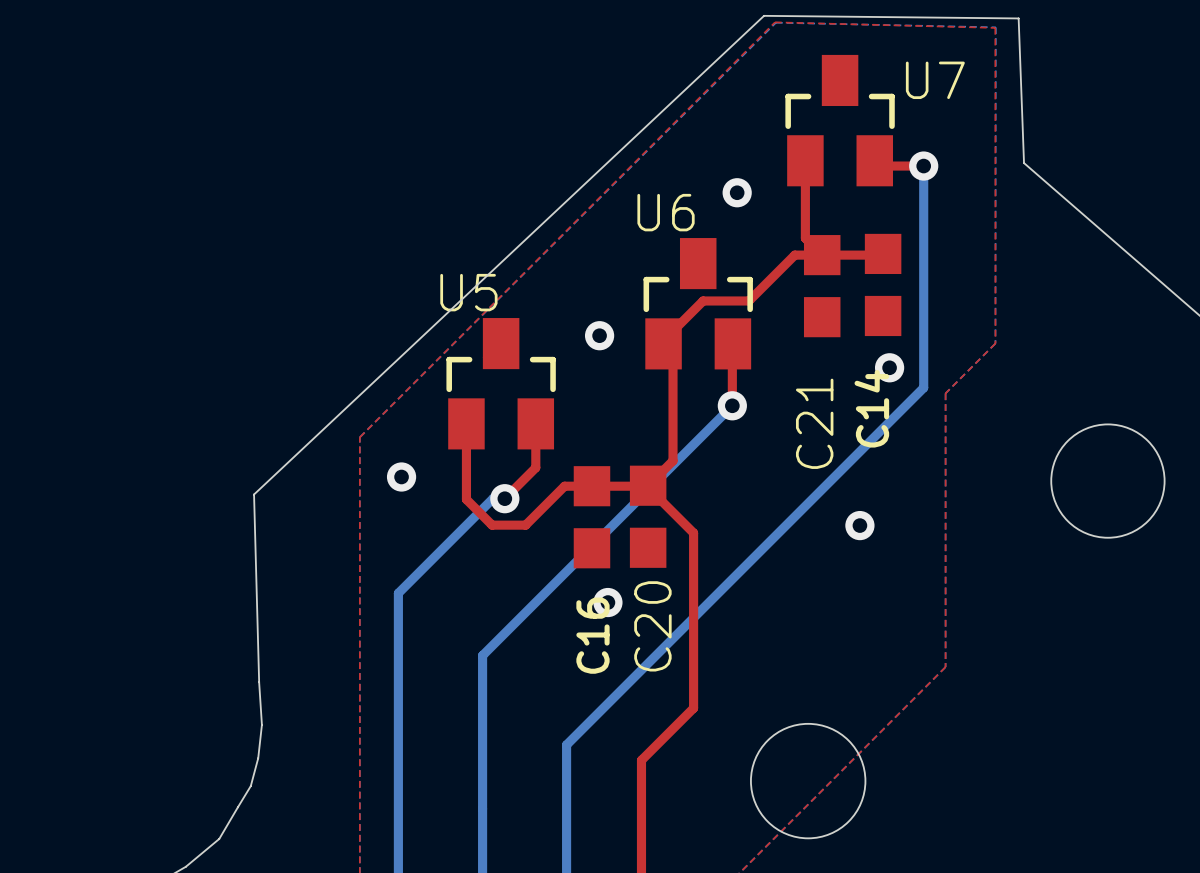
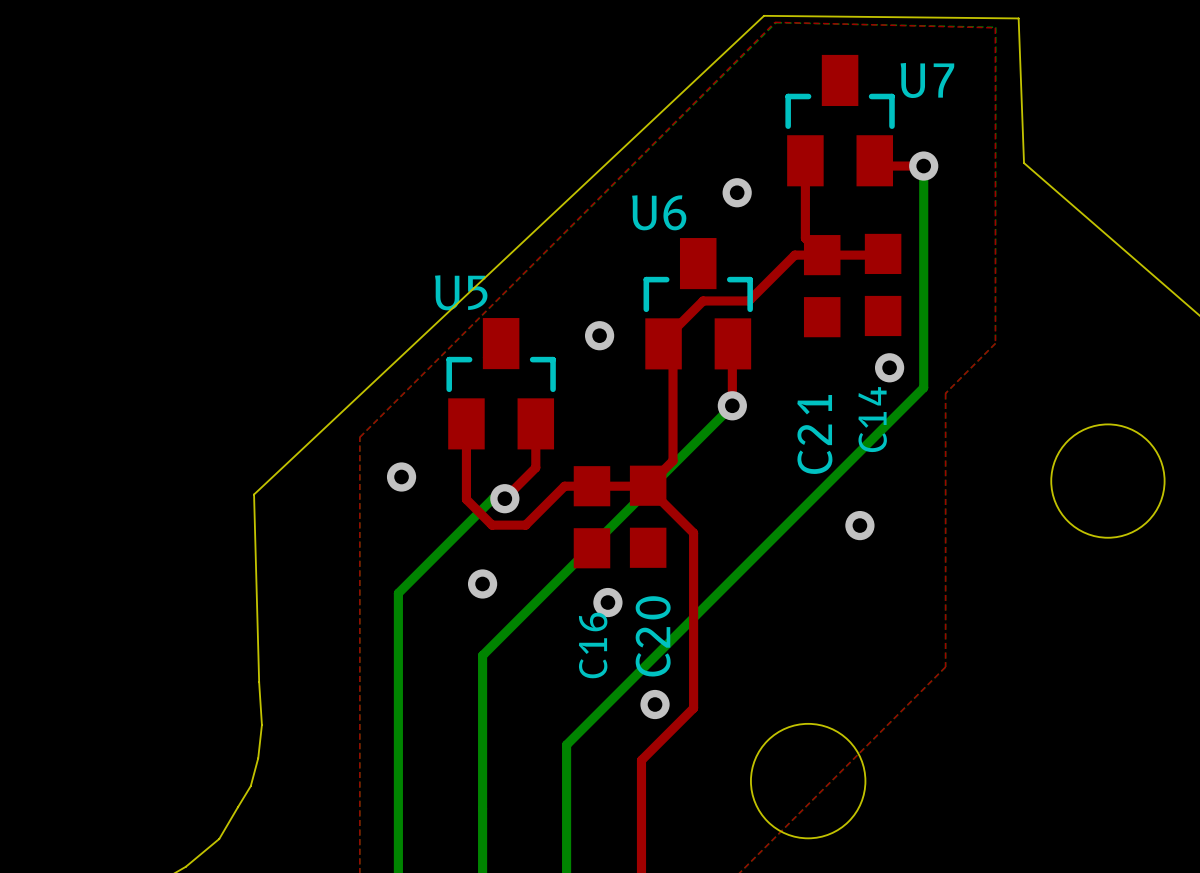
via: none -> (482, 583)
via: none -> (655, 704)

